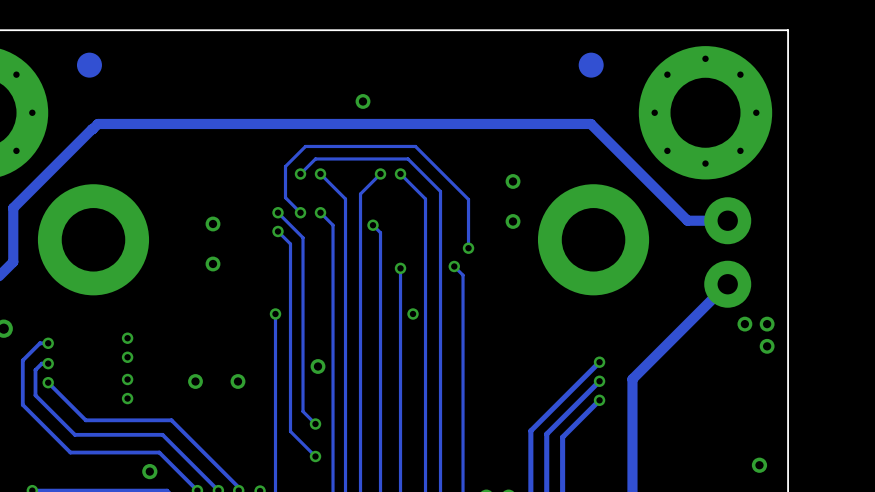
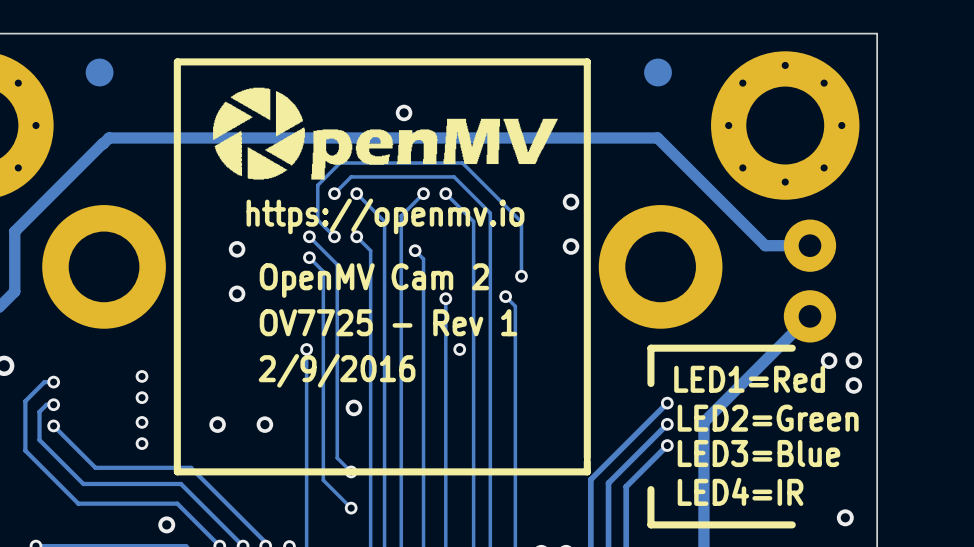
drawing: none -> [213, 87, 558, 180]
text: none -> https://openmv.io (385, 216)
text: none -> OpenMV Cam 2 (374, 280)
text: none -> OV7725 - Rev 1 (388, 322)
line: none -> (792, 348) (650, 348) (650, 383)
text: none -> 2/9/2016 (337, 370)
text: none -> LED1=Red (749, 379)
text: none -> LED2=Green (768, 418)
text: none -> LED3=Blue (758, 453)
line: none -> (587, 457) (587, 61) (177, 61) (177, 471) (587, 471) (587, 461)
line: none -> (650, 489) (650, 524) (792, 524)
text: none -> LED4=IR (740, 491)

